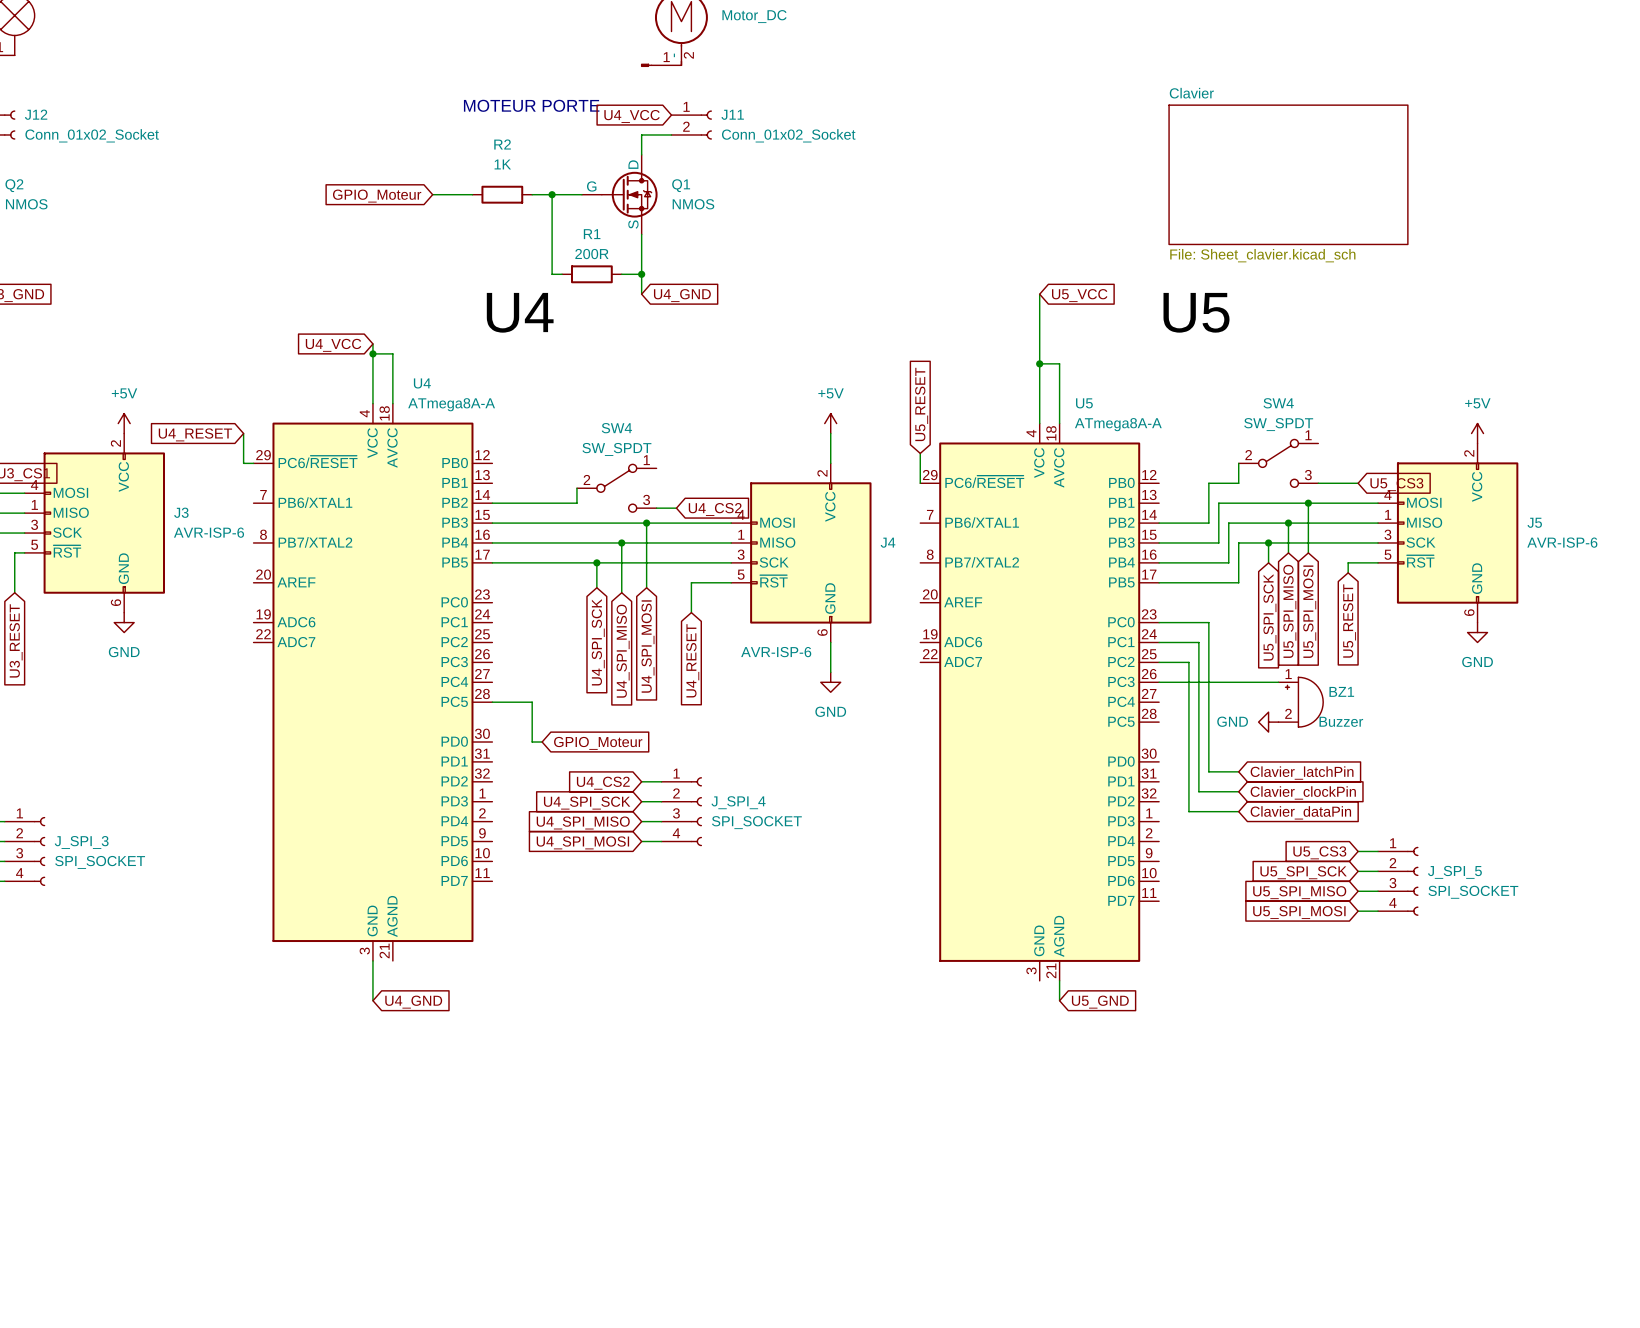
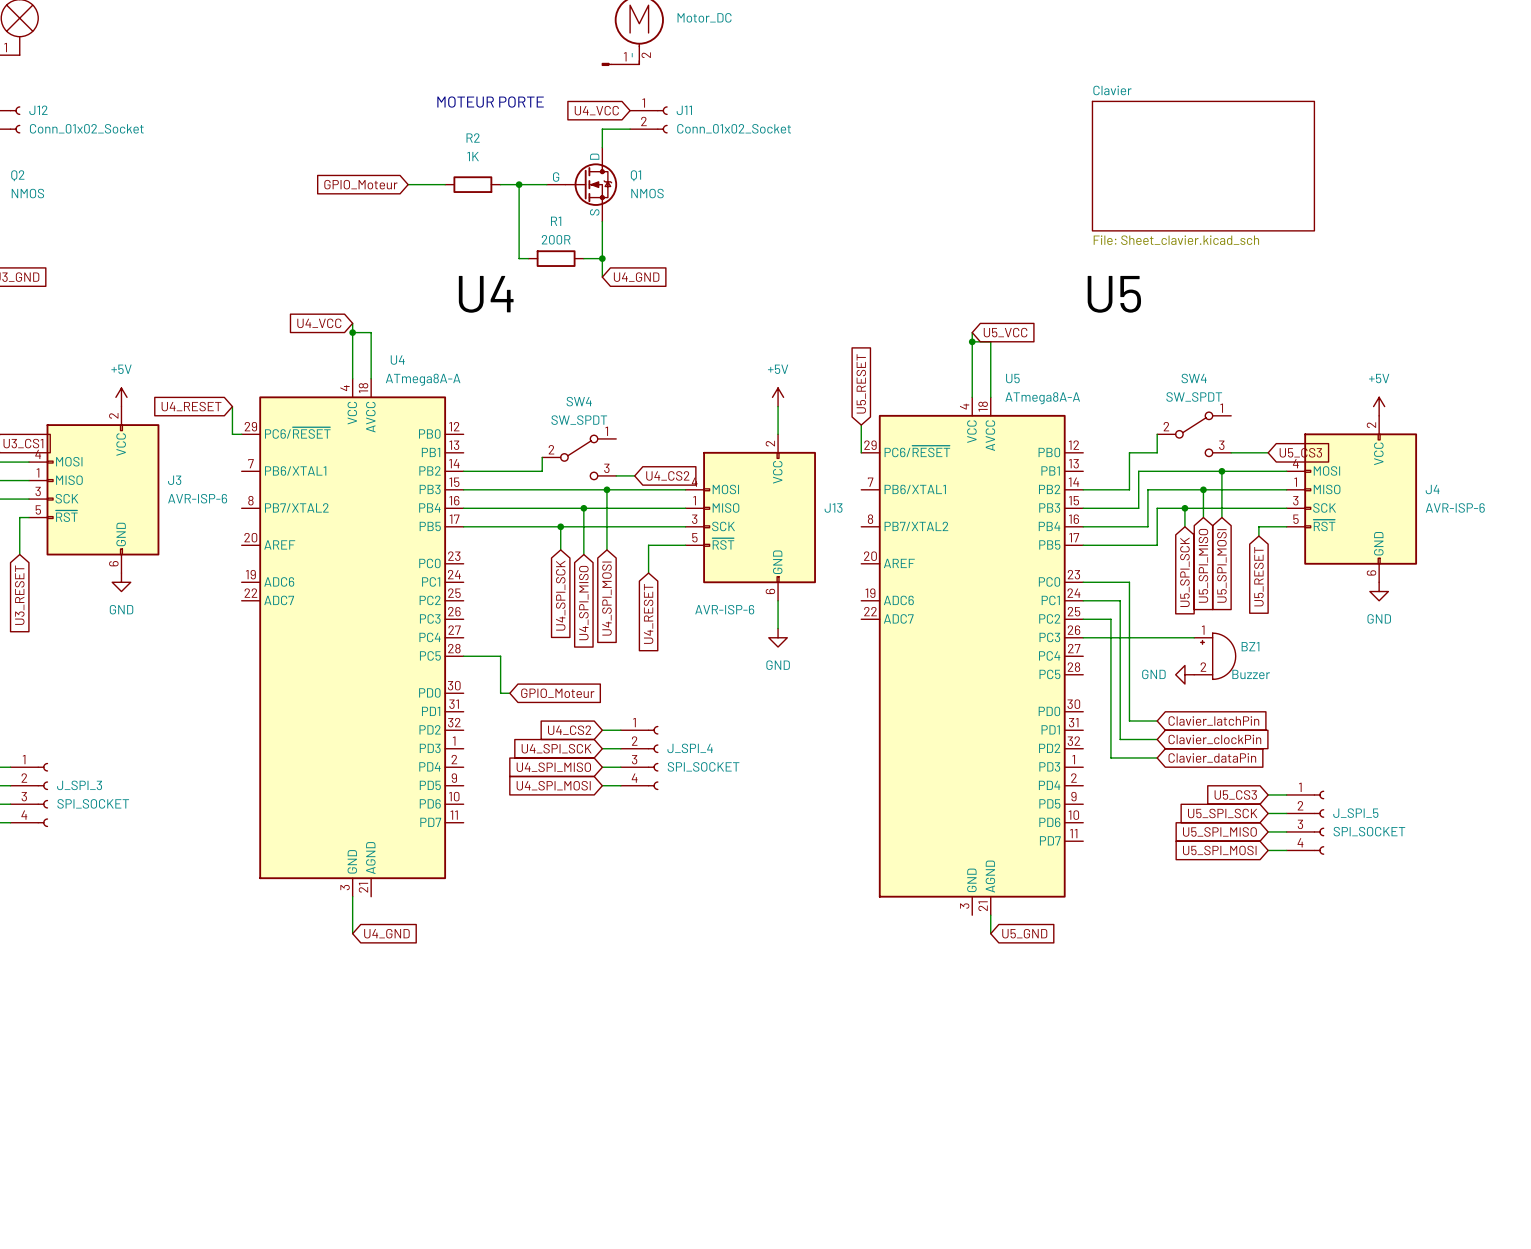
wire: (1039, 294) (1039, 353) -> none
global label position: U5_VCC (1079, 295) -> U5_VCC (1005, 332)
J5 name: J5 (1534, 522) -> J4 (1432, 489)
J4 name: J4 (888, 542) -> J13 (833, 508)

